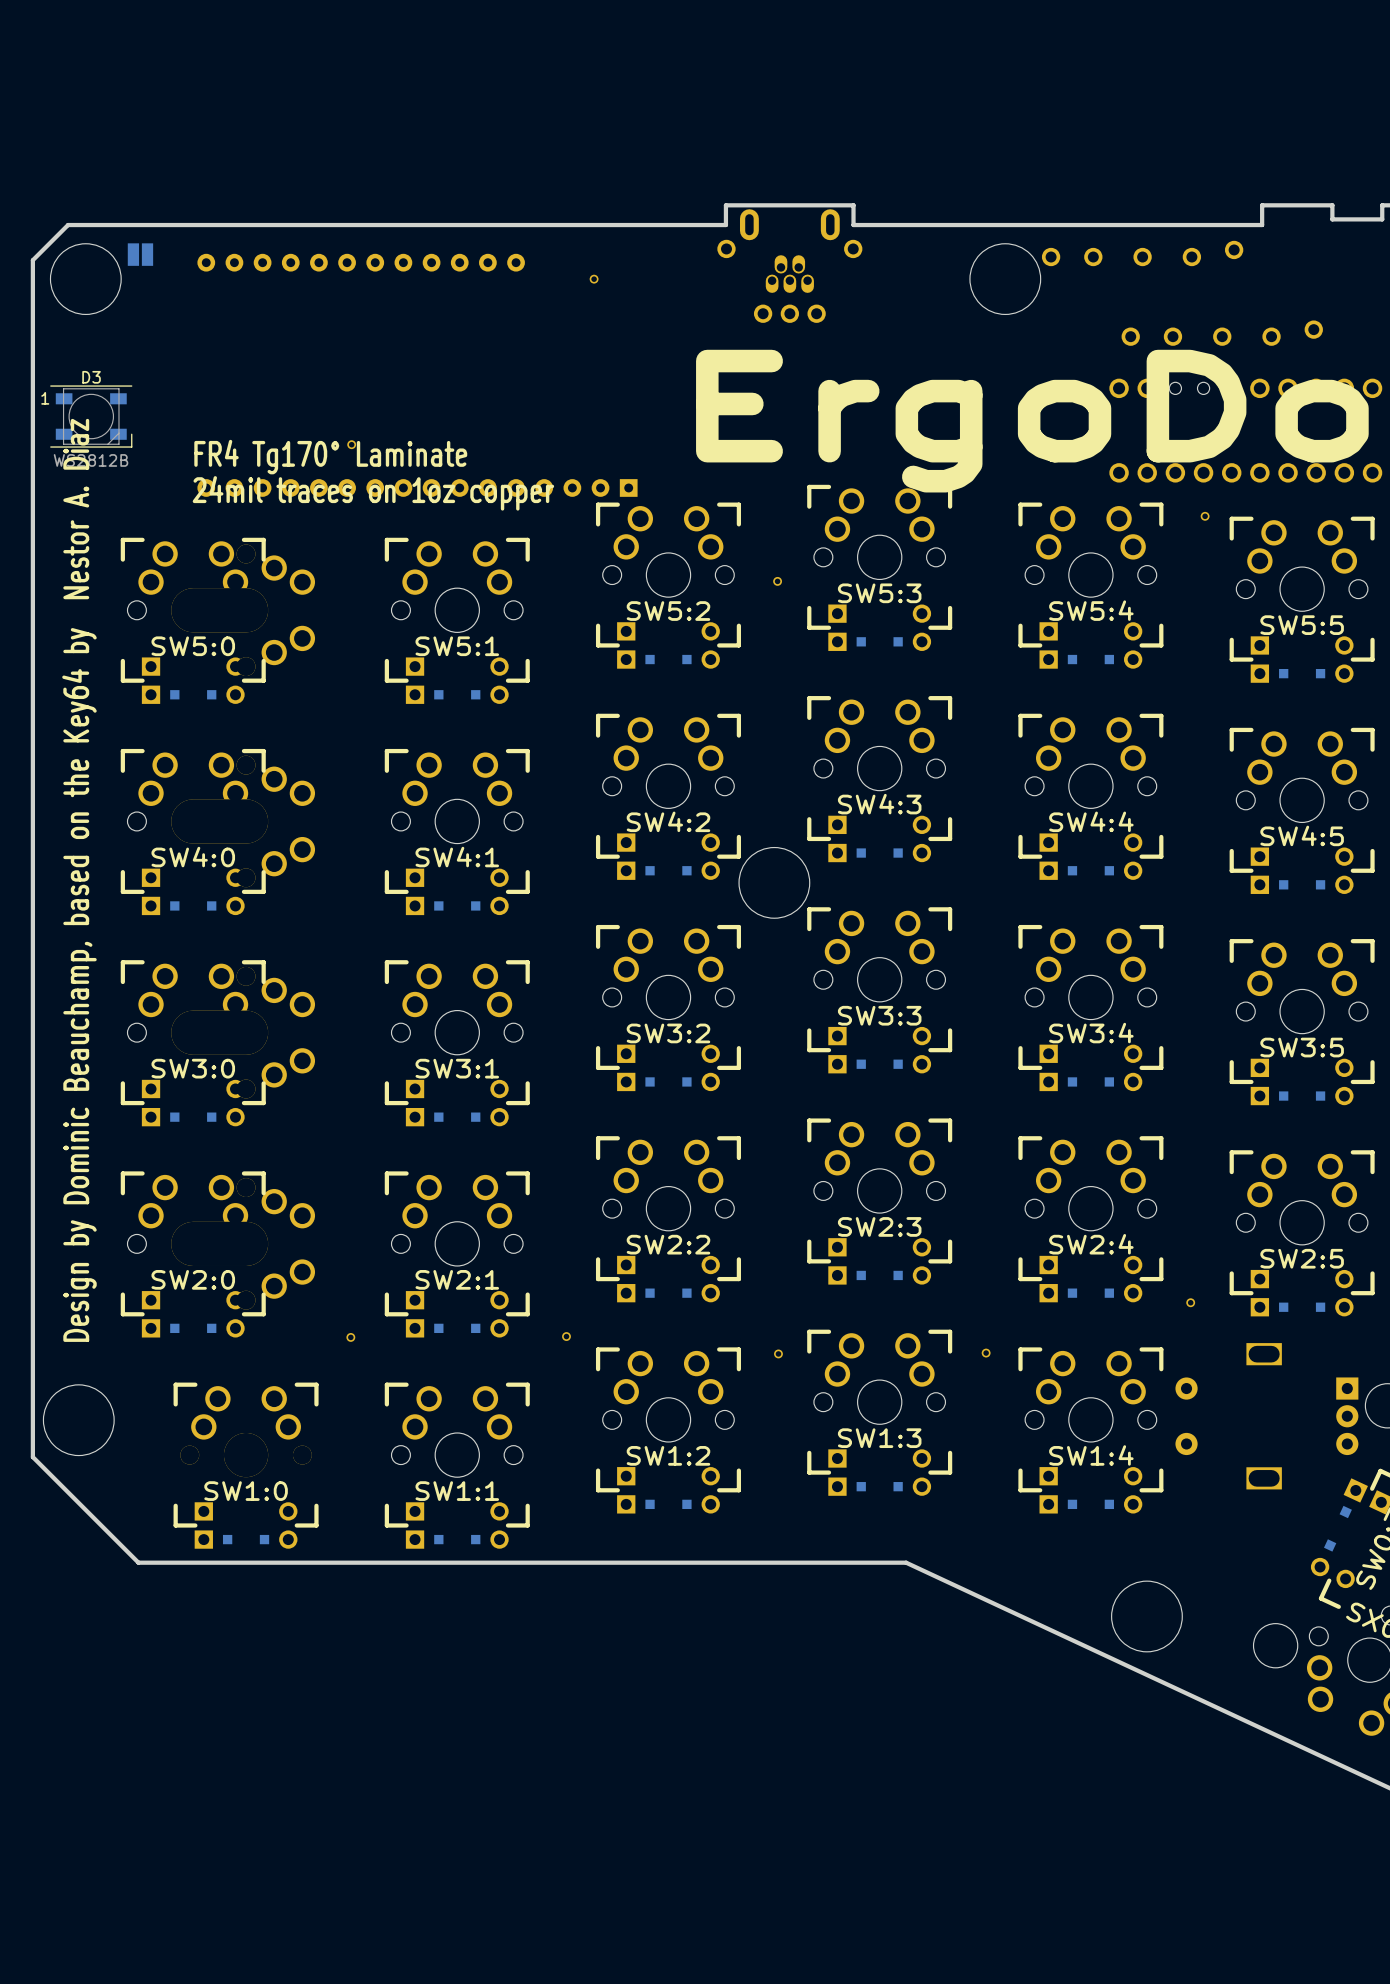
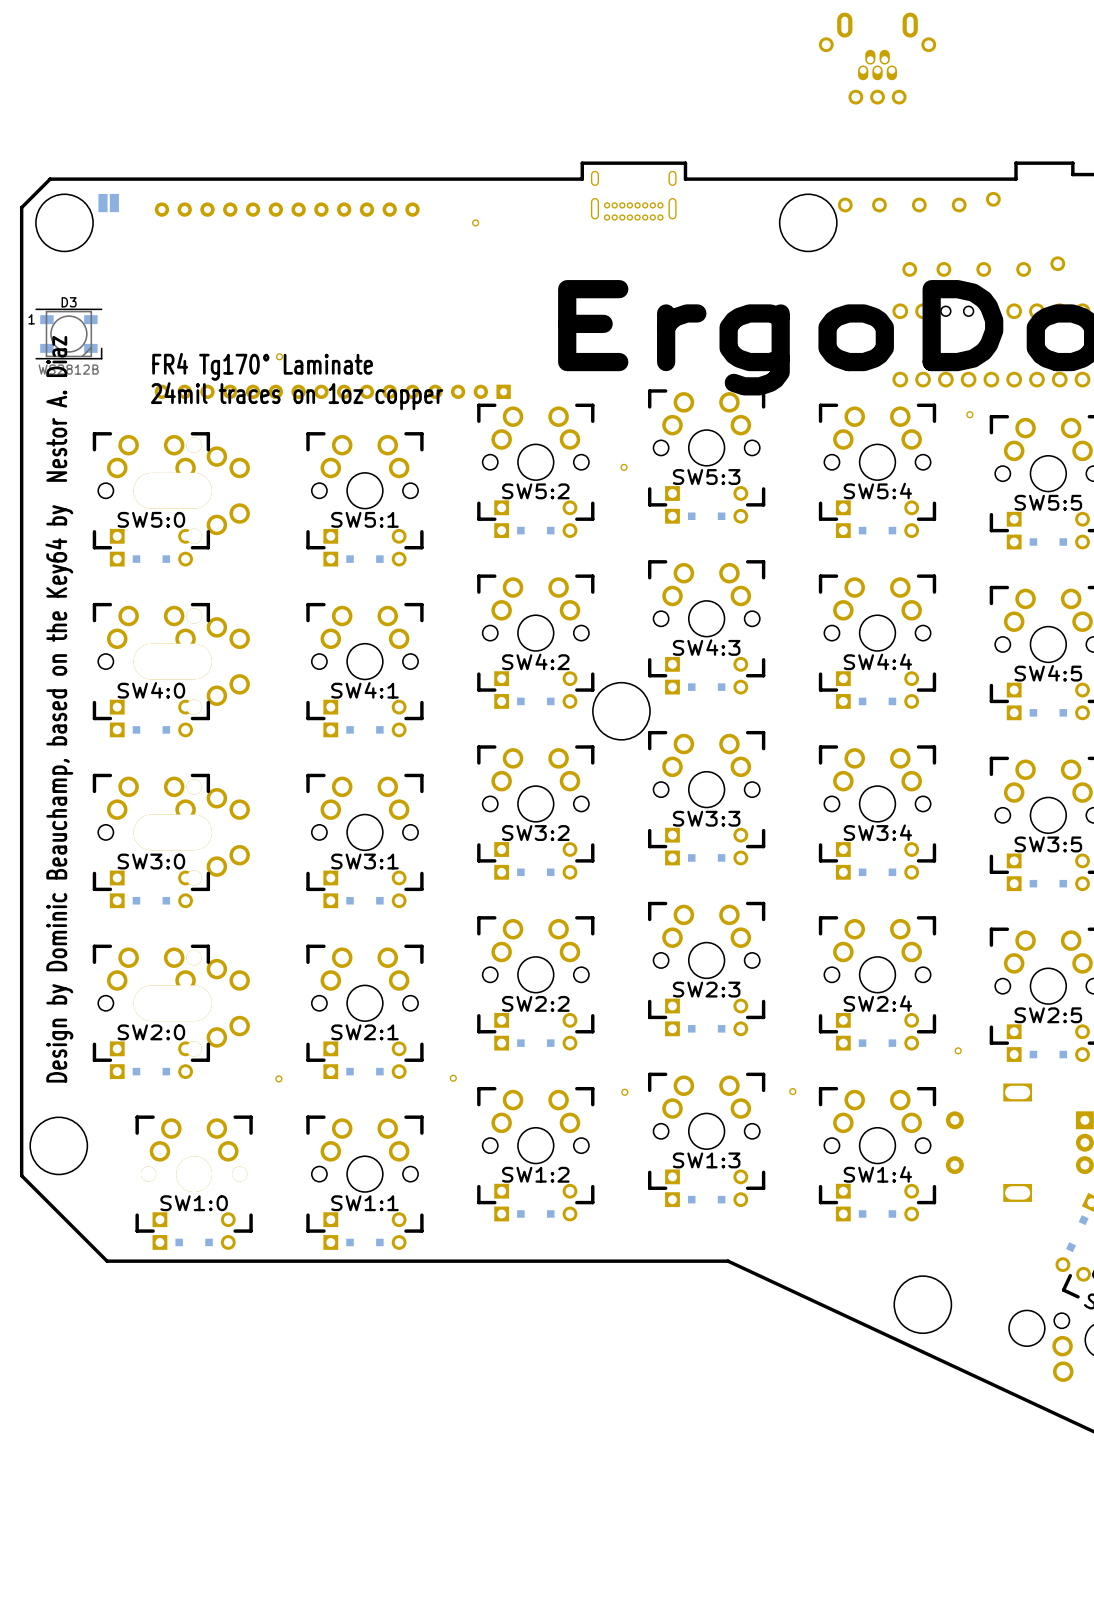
part: none -> (877, 58)
part: none -> (633, 195)
part: (789, 266) -> none

